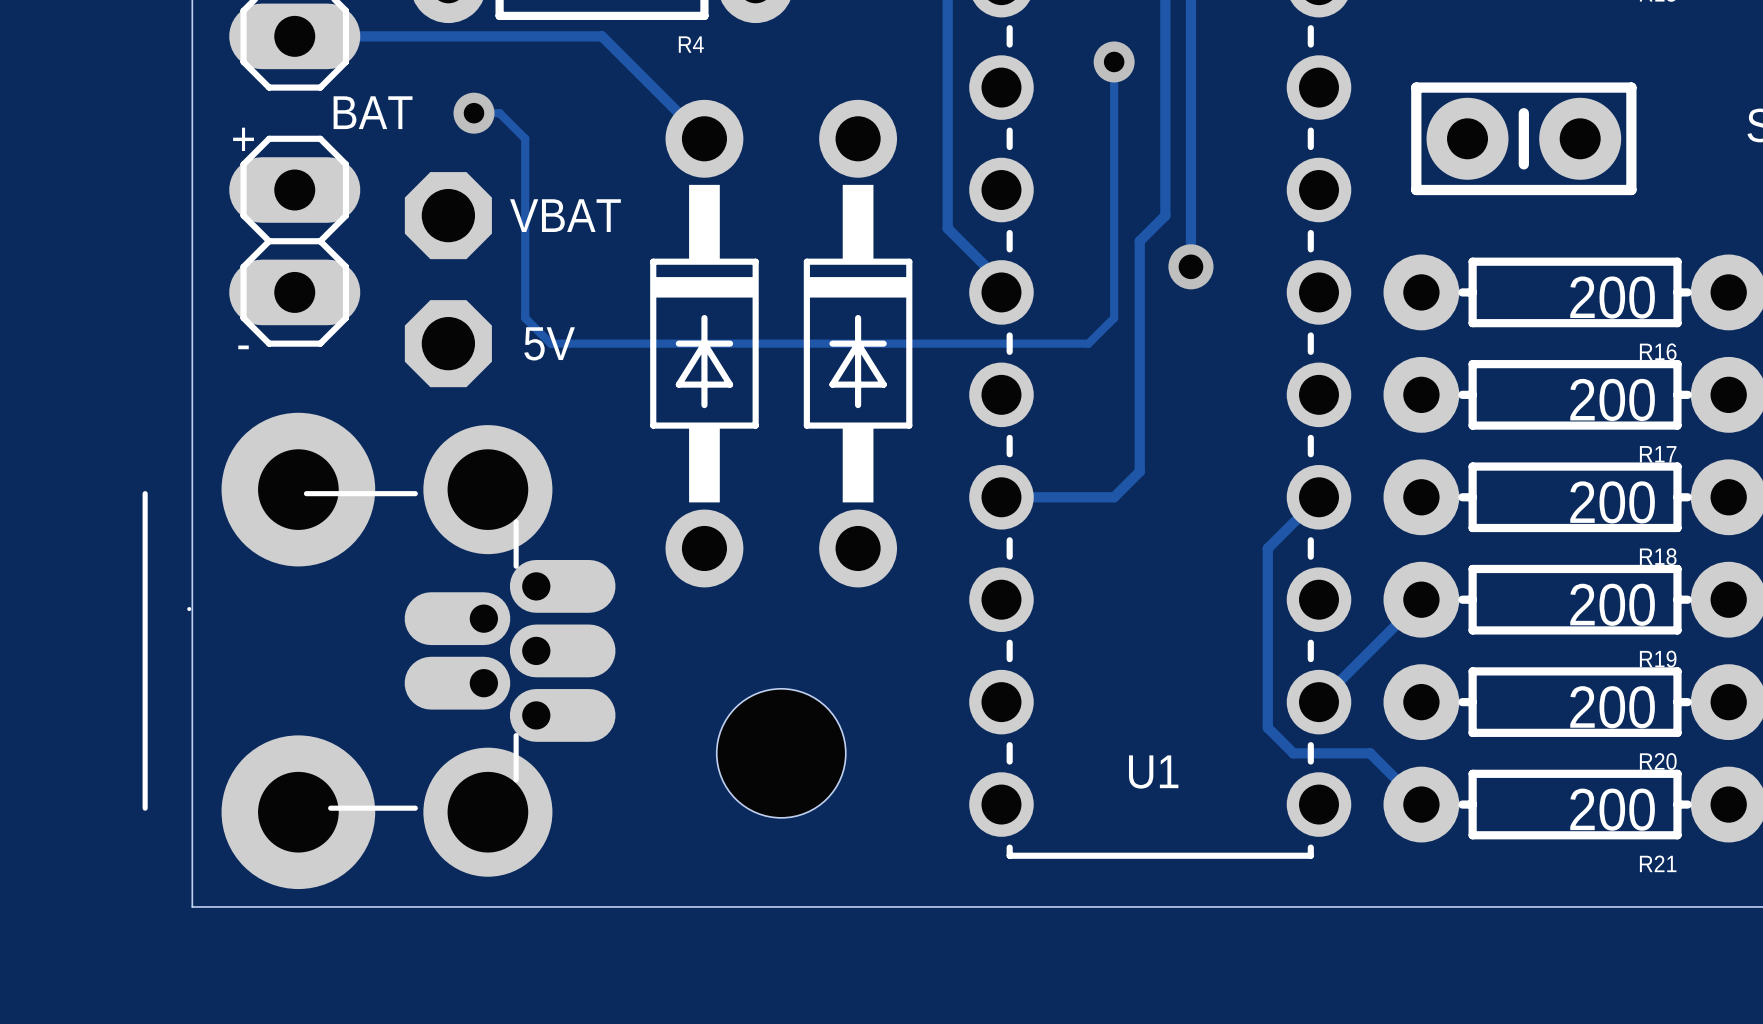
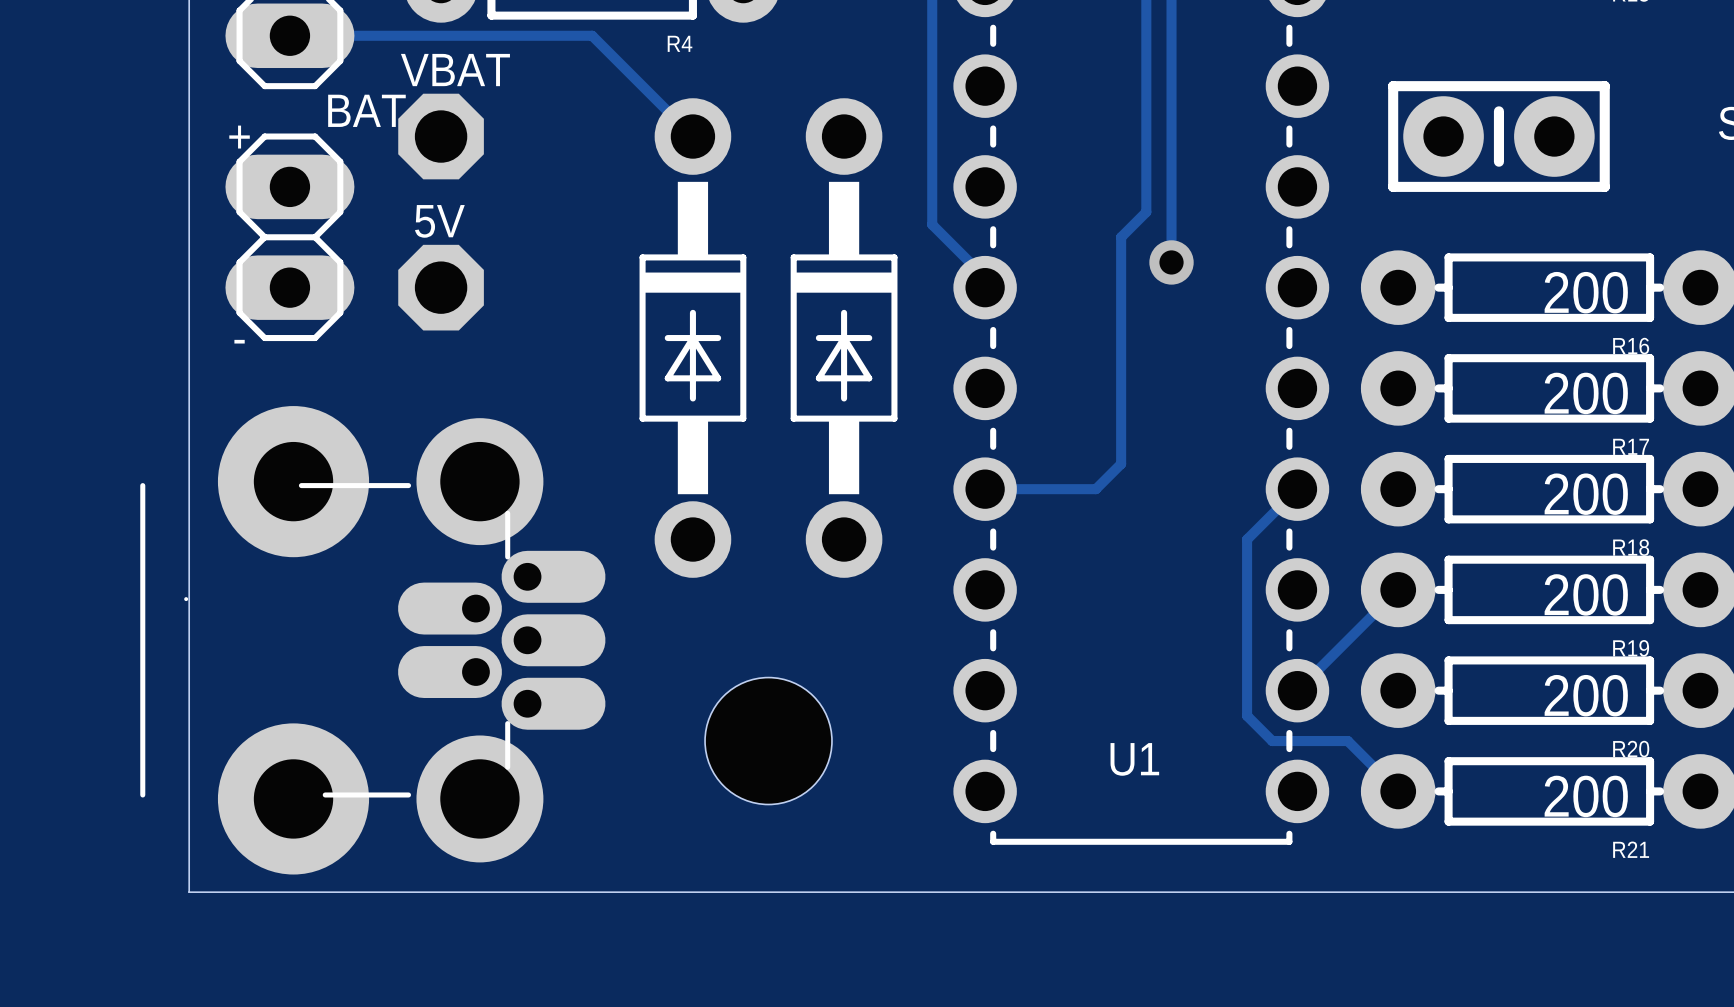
track: (1114, 61) (1114, 318) (1088, 343) (550, 343) (525, 318) (525, 138) (499, 113) (473, 113) -> none
via: (1114, 61) -> none
via: (473, 113) -> none
VBAT position: (448, 215) -> (441, 136)
VBAT name position: VBAT (565, 215) -> VBAT (455, 70)
5V position: (448, 343) -> (441, 287)
5V name position: 5V (549, 343) -> 5V (439, 221)

